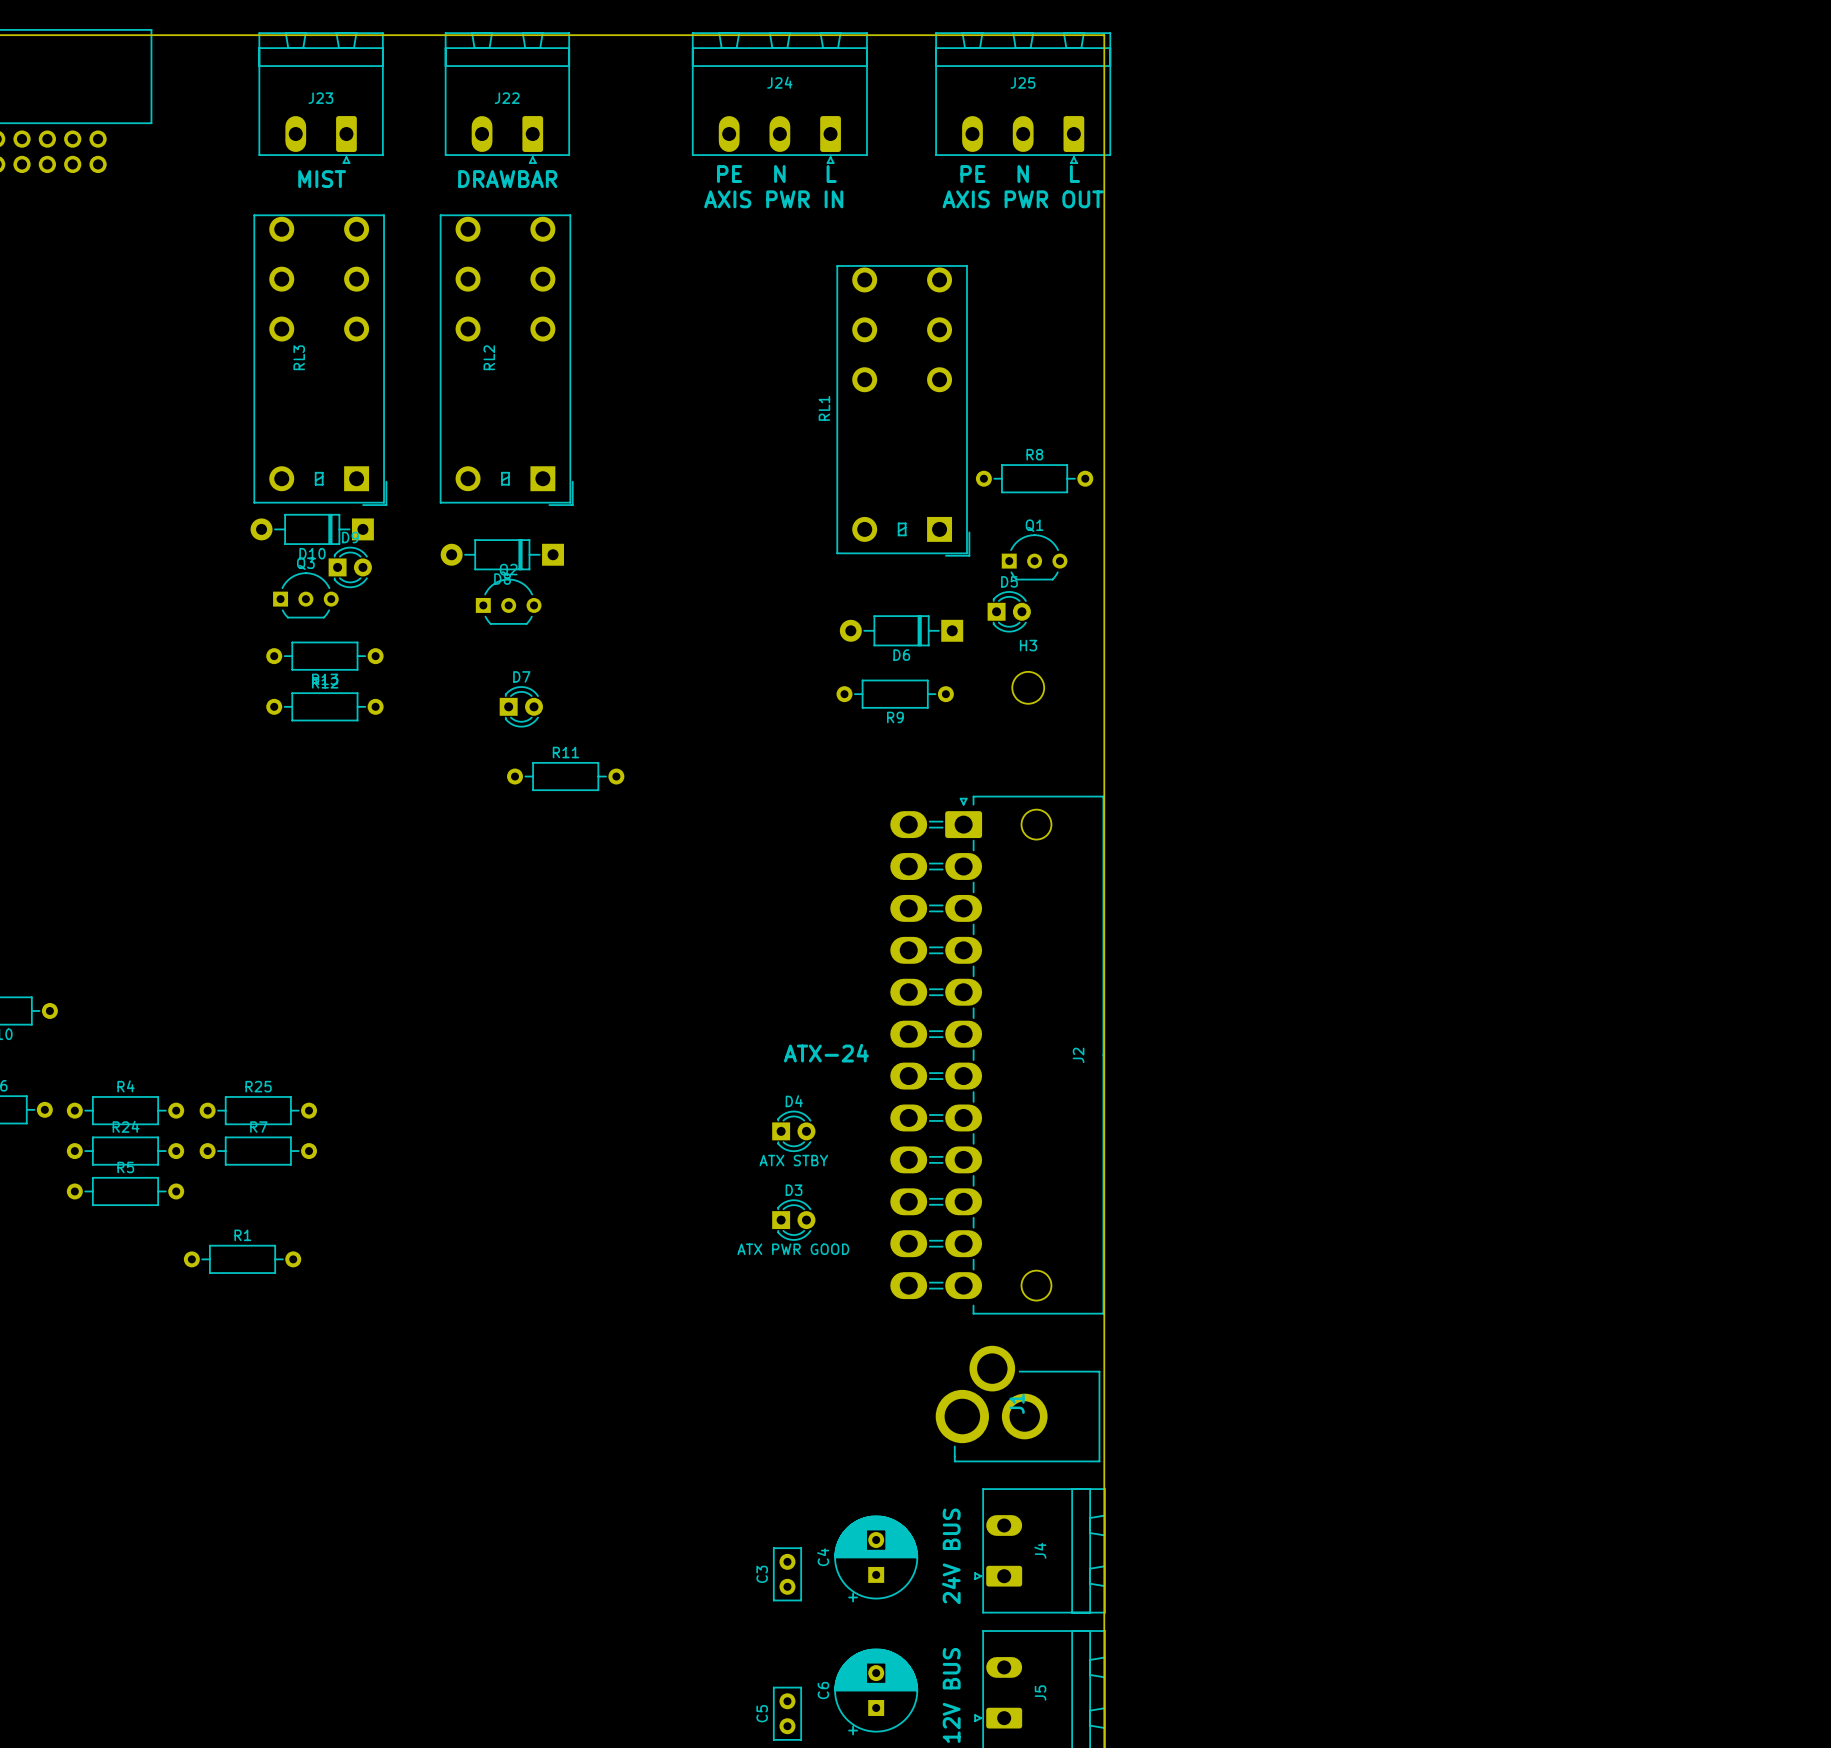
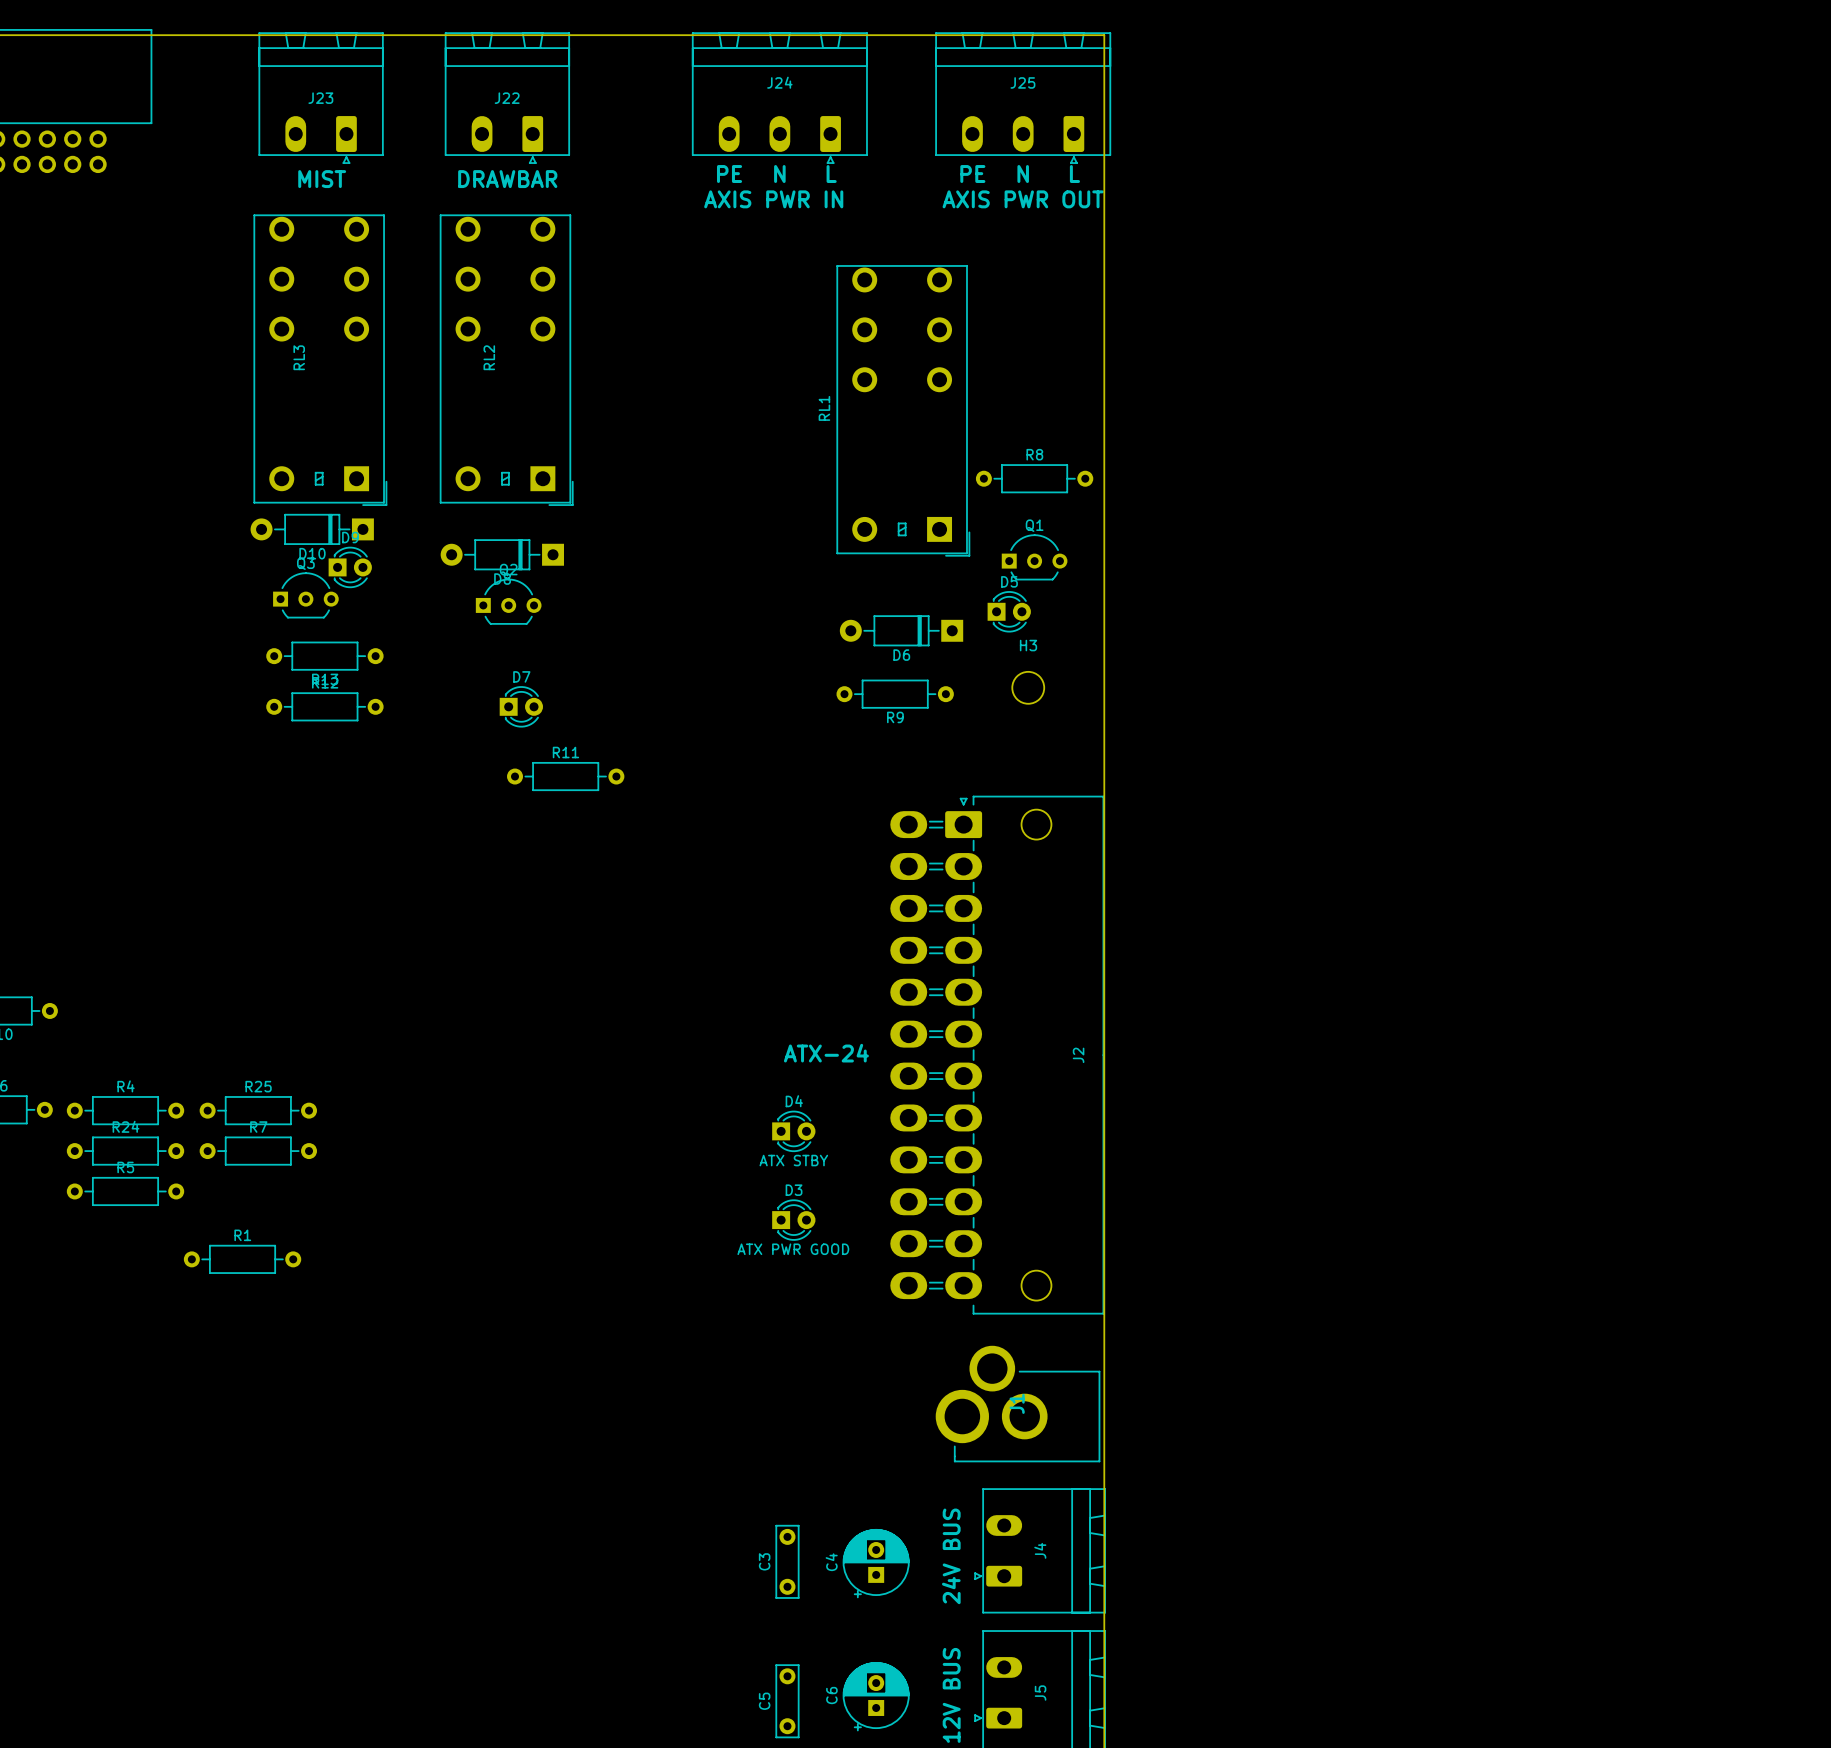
C4 footprint: [834, 1515, 918, 1603] -> [842, 1529, 910, 1598]
C3 footprint: [773, 1547, 802, 1602] -> [775, 1525, 800, 1599]
C6 footprint: [834, 1648, 918, 1736] -> [842, 1662, 910, 1732]
C5 footprint: [773, 1686, 802, 1741] -> [775, 1664, 800, 1738]

